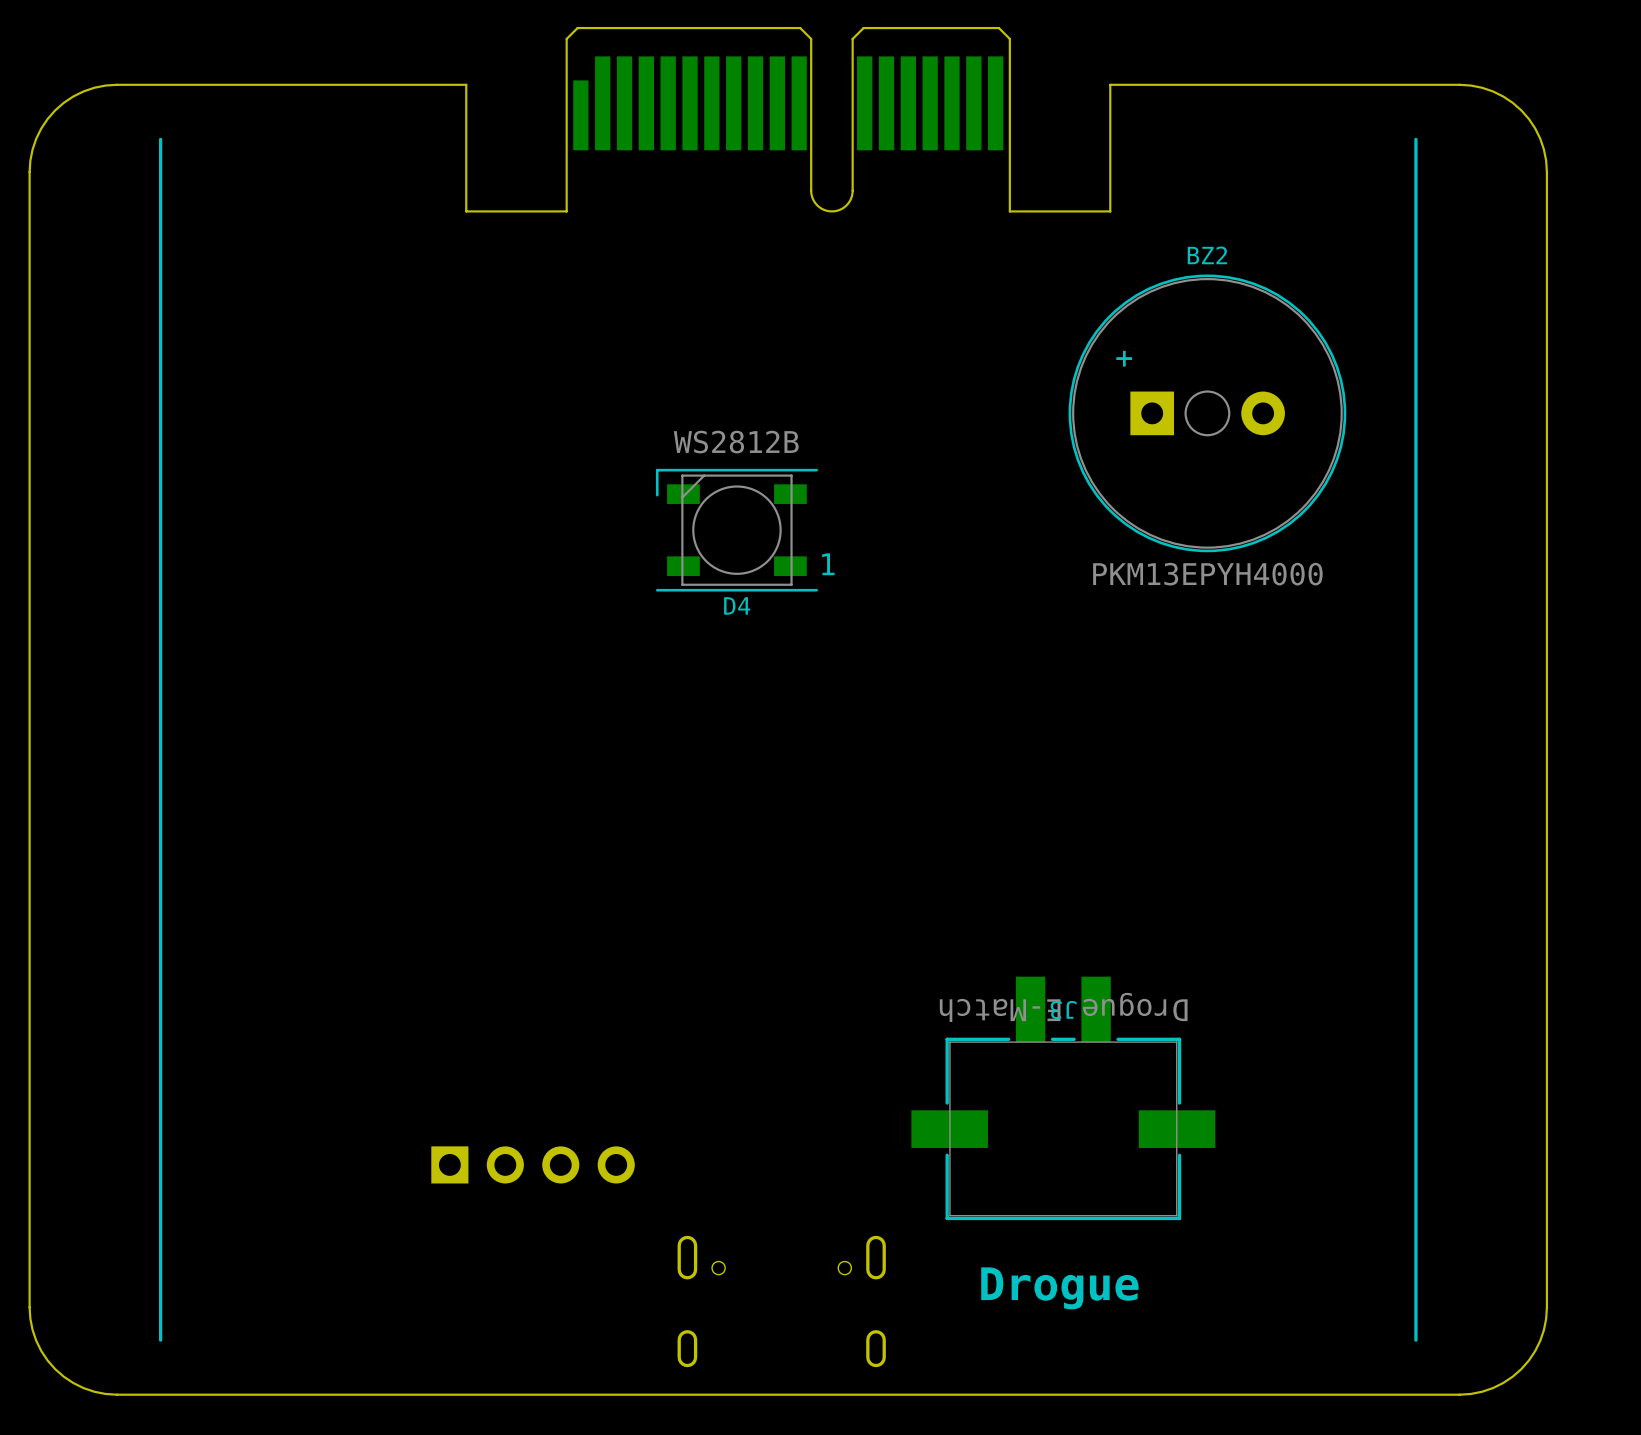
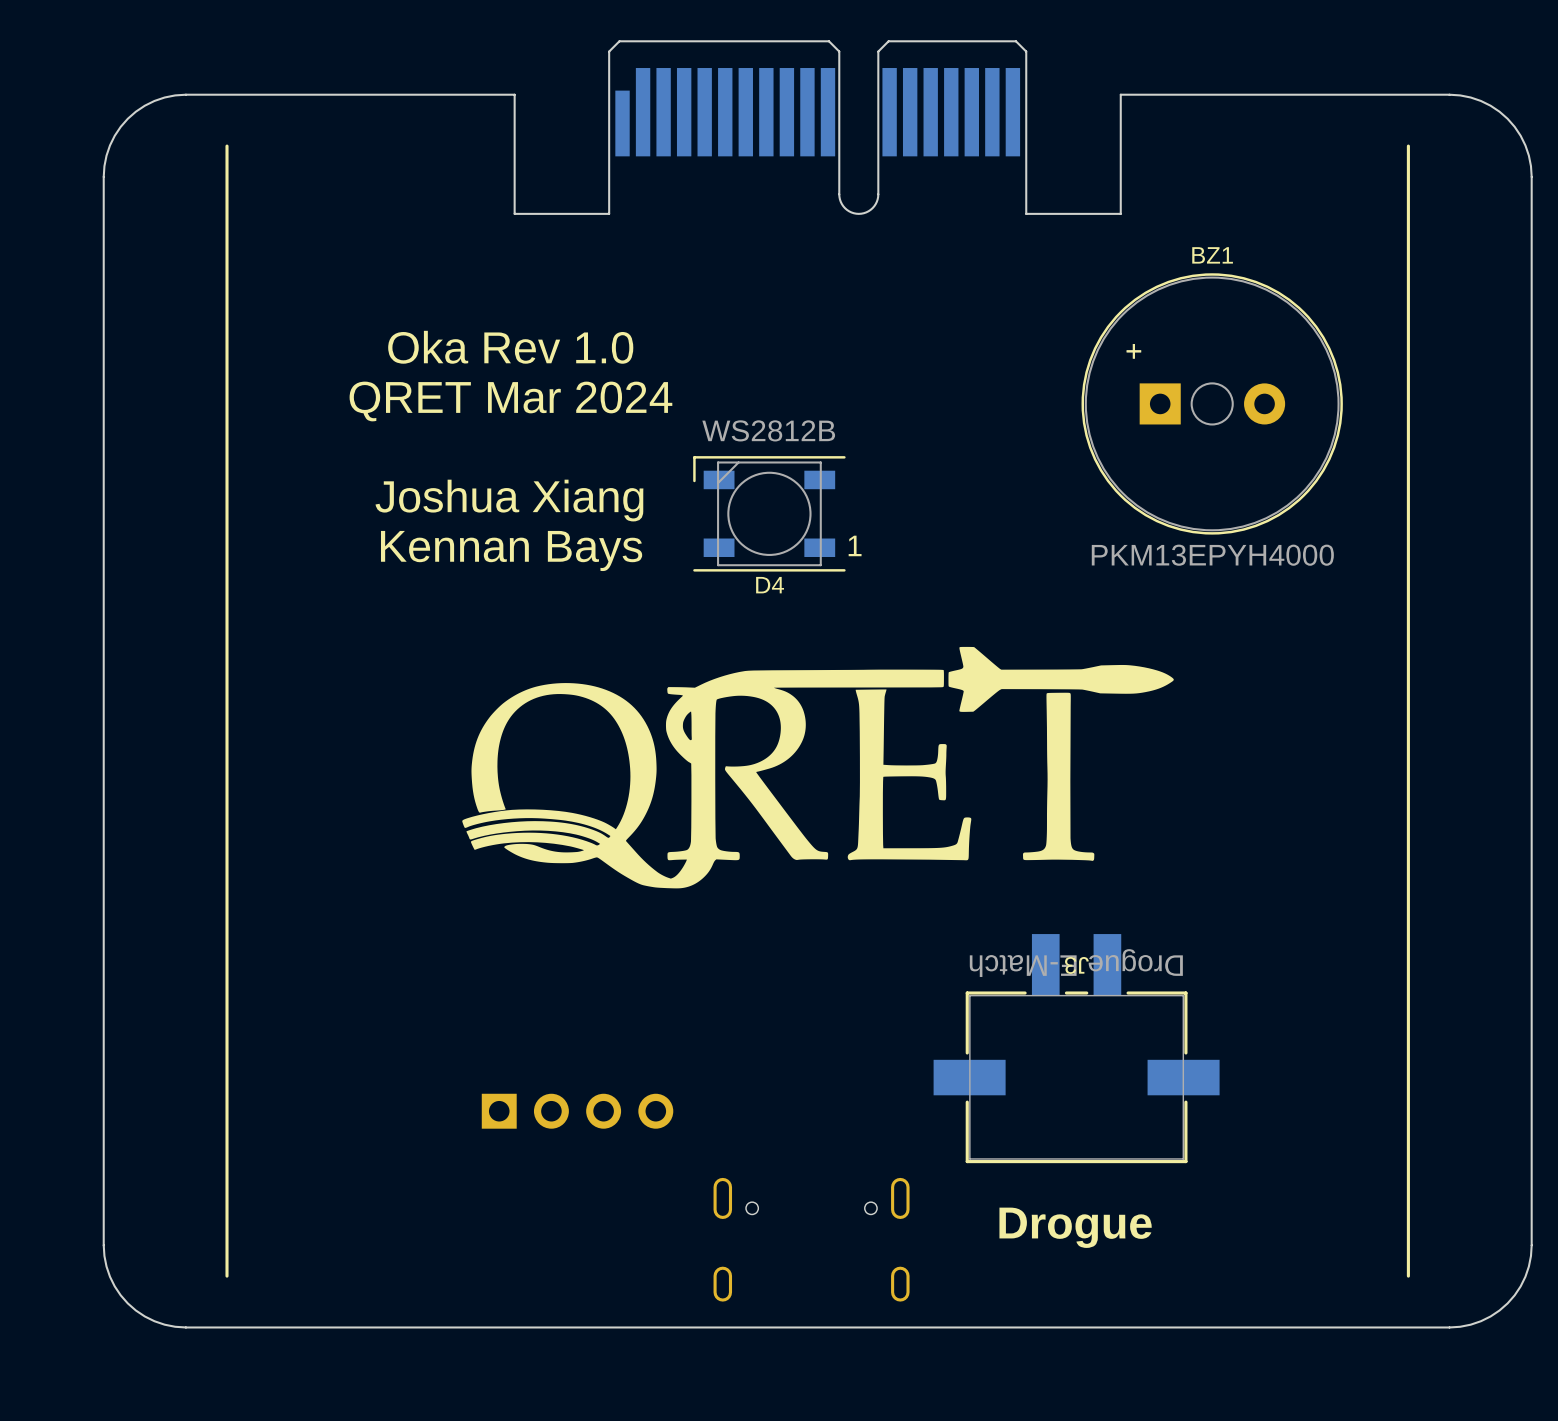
BZ2 name: BZ2 (1207, 255) -> BZ1 (1212, 255)
text: none -> Oka Rev 1.0 (510, 347)
text: none -> QRET Mar 2024 (510, 401)
text: none -> Joshua Xiang (509, 500)
text: none -> Kennan Bays (511, 550)
drawing: none -> [462, 646, 1174, 889]

